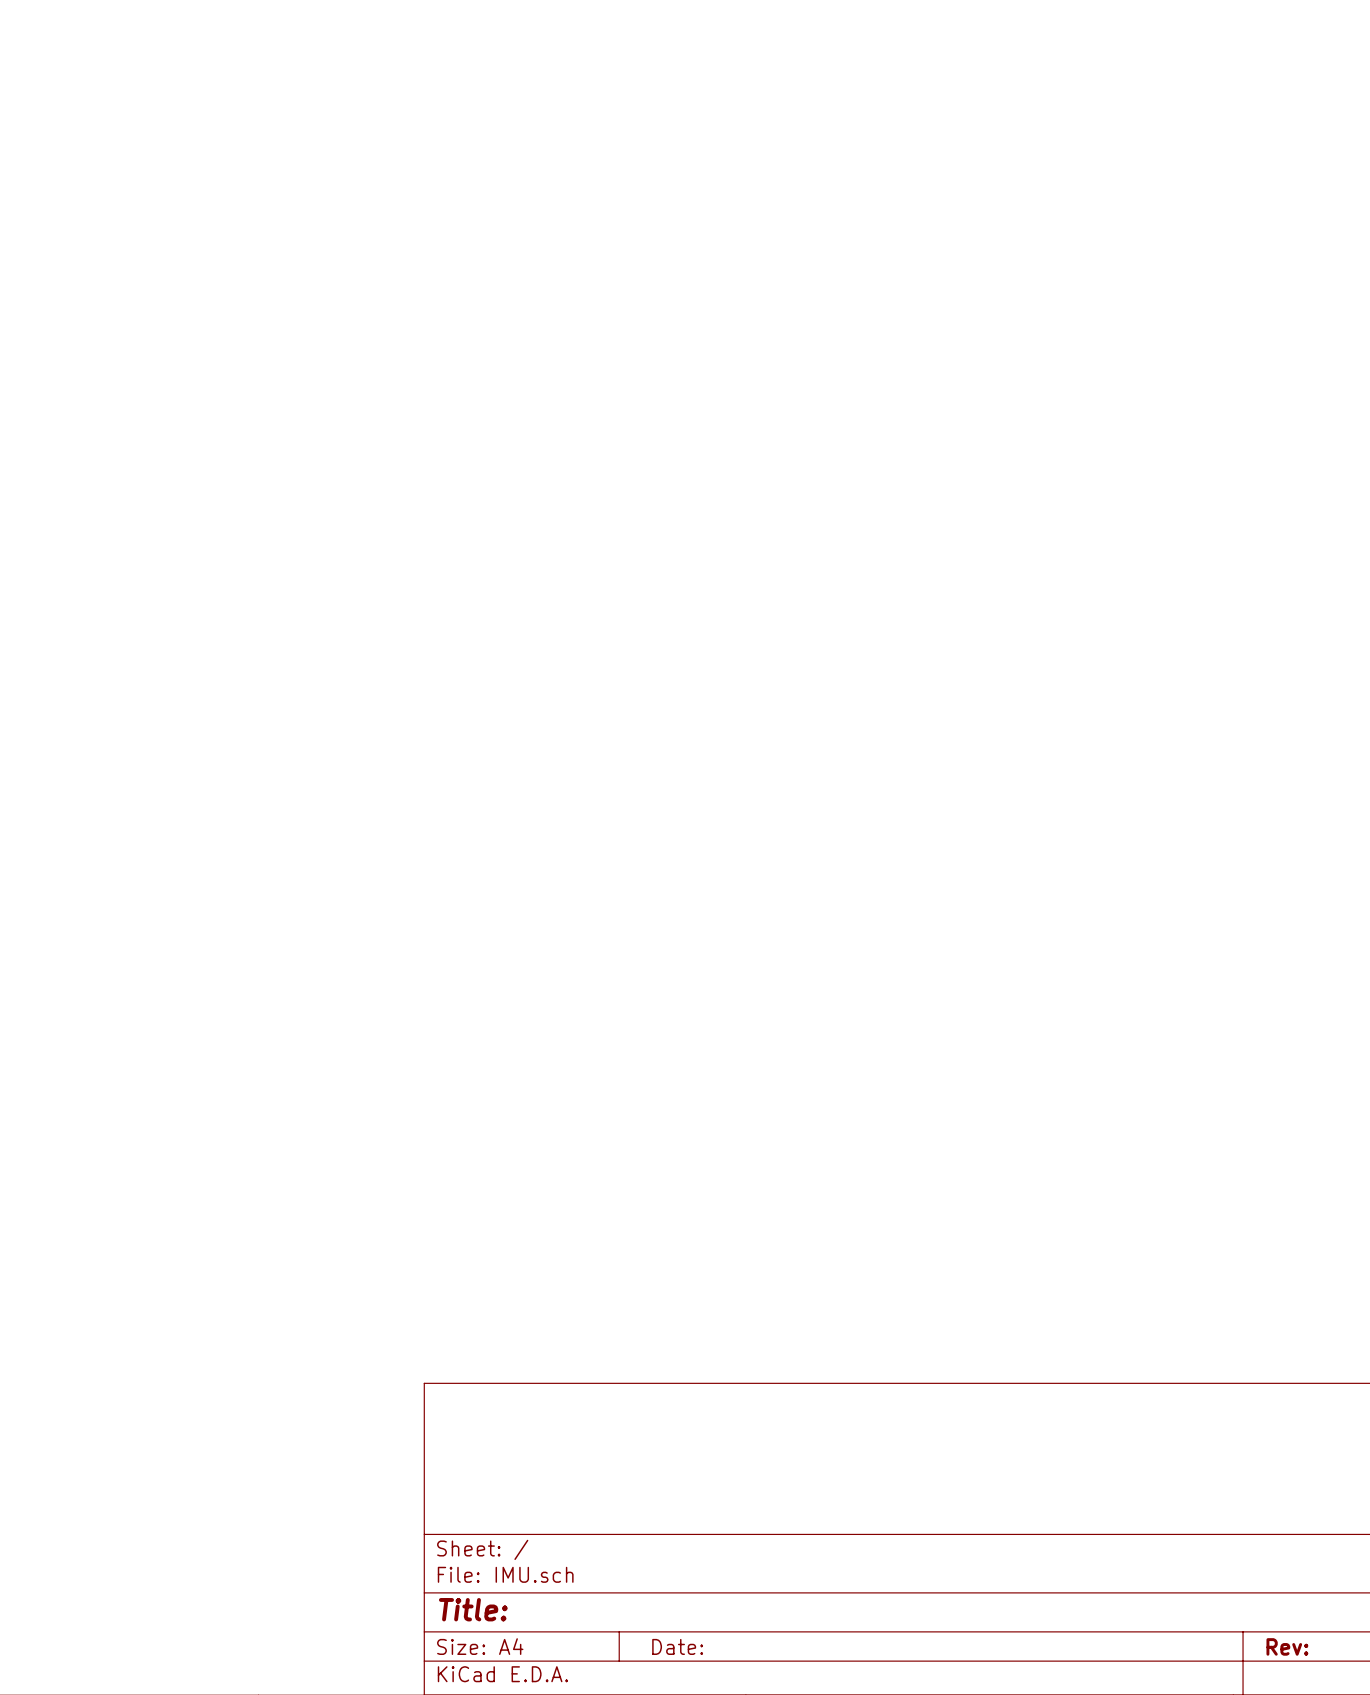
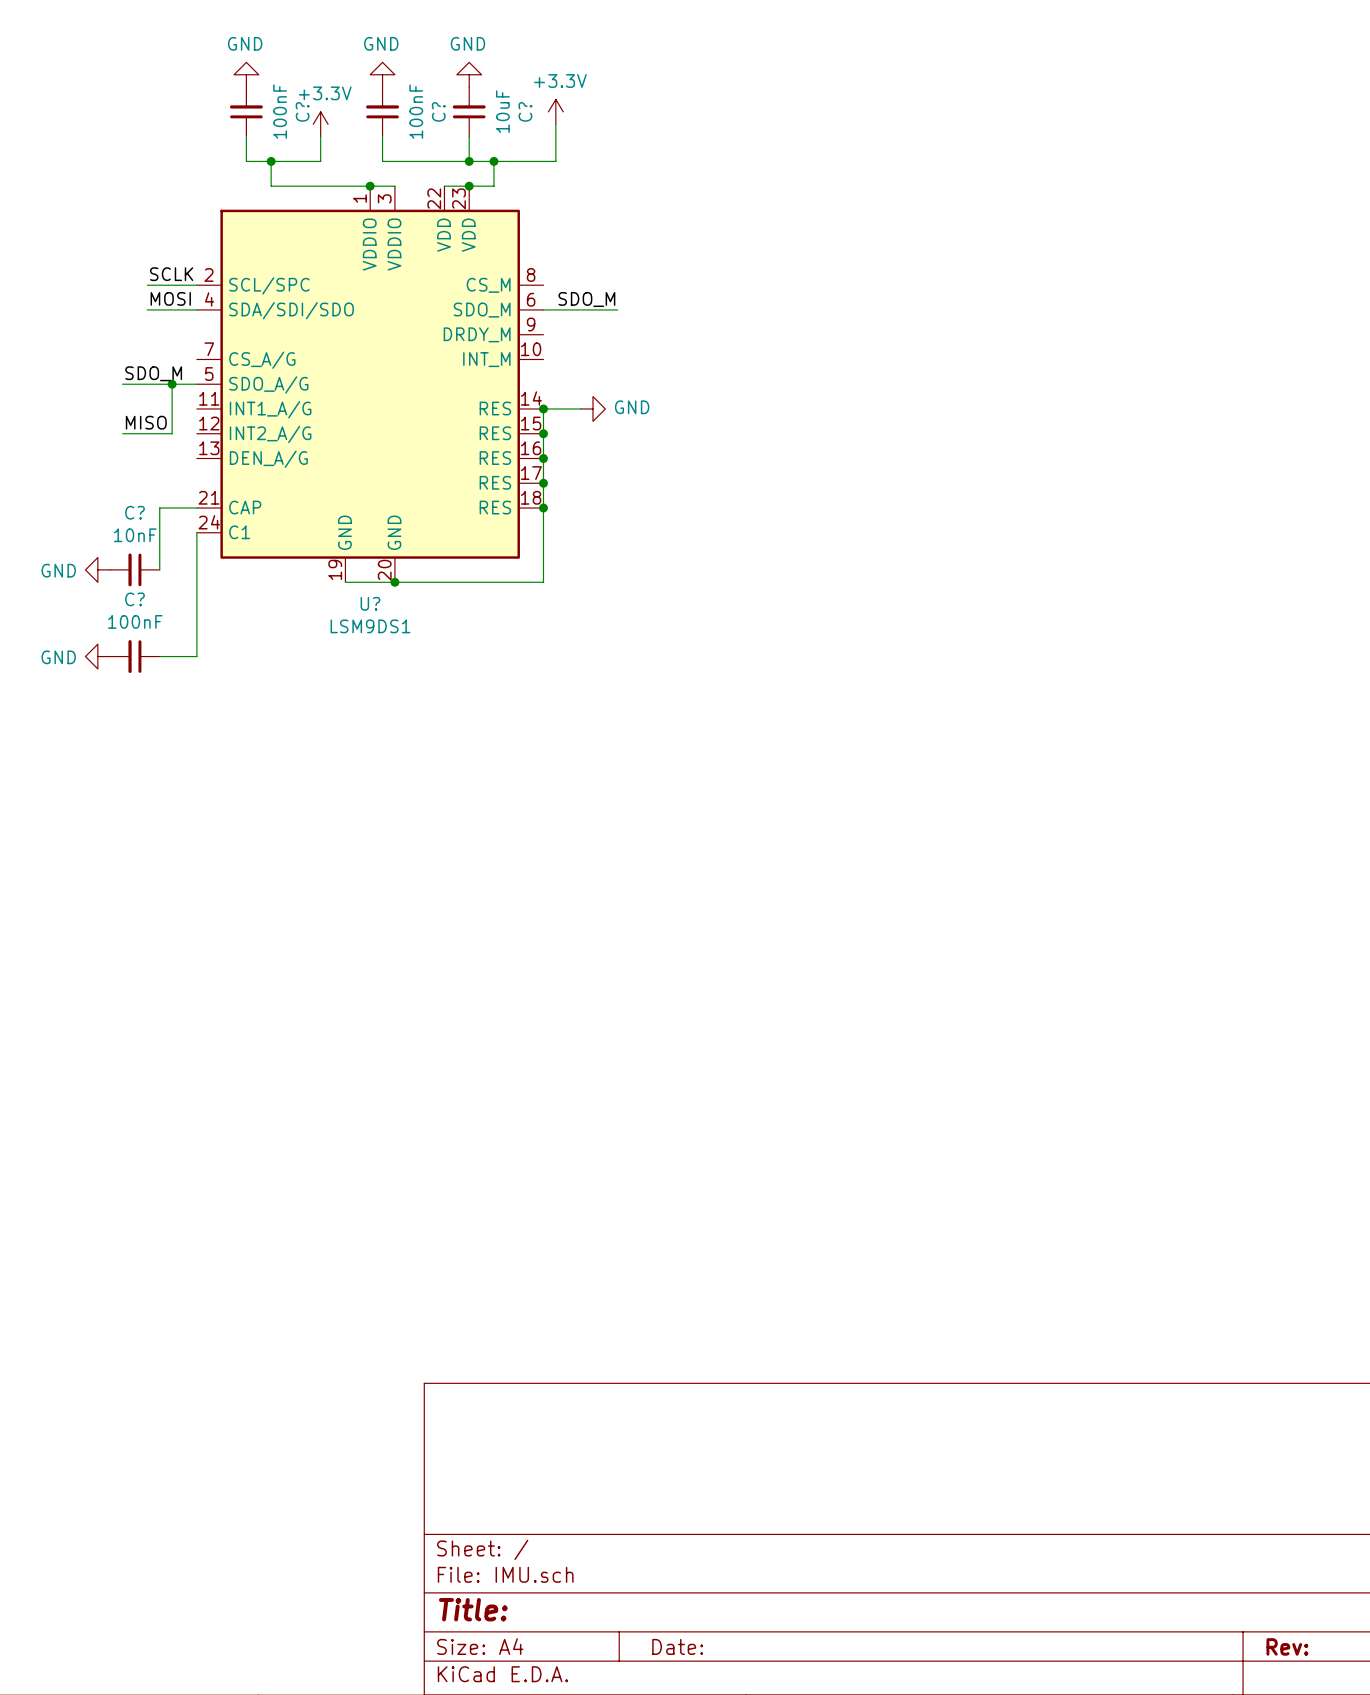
power symbol: none -> GND (246, 74)
power symbol: none -> GND (382, 74)
power symbol: none -> GND (469, 74)
C?: none -> 100nF (246, 111)
C?: none -> 100nF (382, 111)
C?: none -> 10uF (469, 111)
power symbol: none -> +3.3V (555, 111)
power symbol: none -> +3.3V (320, 124)
wire: none -> (555, 124) (555, 161) (382, 161) (382, 136)
wire: none -> (246, 136) (246, 161) (320, 161) (320, 136)
wire: none -> (469, 136) (469, 161)
wire: none -> (271, 161) (271, 186) (394, 186)
junction: none -> (271, 161)
junction: none -> (469, 161)
wire: none -> (493, 161) (493, 186) (444, 186)
junction: none -> (493, 161)
junction: none -> (370, 186)
junction: none -> (469, 186)
label: none -> SCLK (171, 274)
wire: none -> (147, 285) (196, 285)
label: none -> MOSI (170, 298)
label: none -> SDO_M (586, 299)
wire: none -> (147, 309) (196, 309)
wire: none -> (543, 309) (617, 309)
label: none -> SDO_M (153, 373)
wire: none -> (122, 384) (196, 384)
wire: none -> (172, 384) (172, 433) (122, 433)
junction: none -> (172, 384)
U?: none -> LSM9DS1 (370, 384)
junction: none -> (543, 408)
wire: none -> (580, 408) (543, 408) (543, 582) (345, 582)
power symbol: none -> GND (592, 408)
label: none -> MISO (146, 422)
junction: none -> (543, 433)
junction: none -> (543, 458)
junction: none -> (543, 483)
wire: none -> (196, 508) (159, 508) (159, 569)
junction: none -> (543, 508)
wire: none -> (196, 532) (196, 656) (159, 656)
power symbol: none -> GND (97, 569)
C?: none -> 10nF (134, 569)
junction: none -> (394, 582)
power symbol: none -> GND (97, 656)
C?: none -> 100nF (134, 656)

